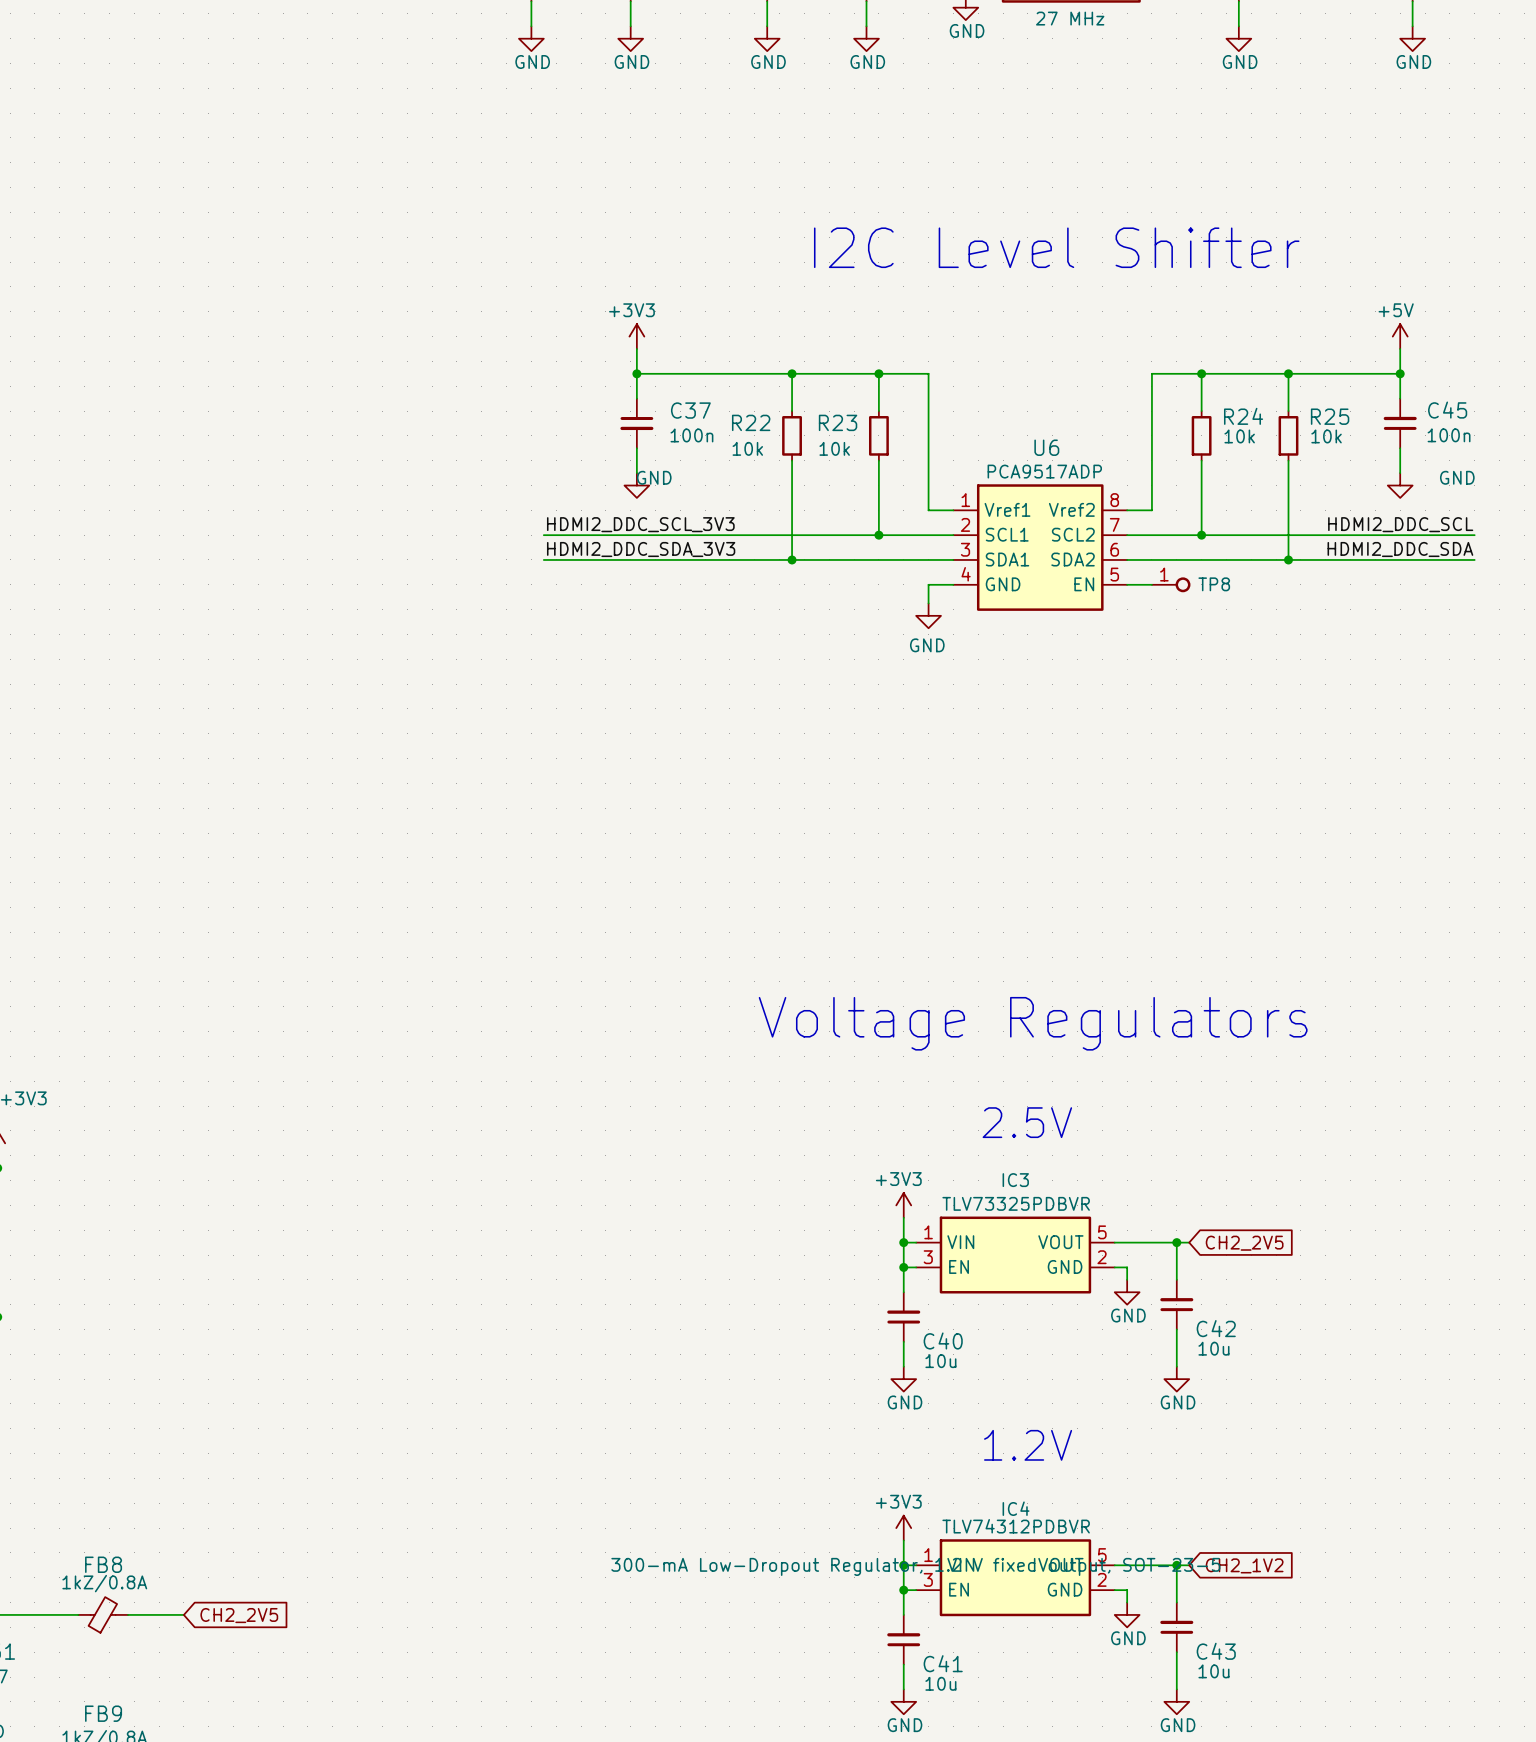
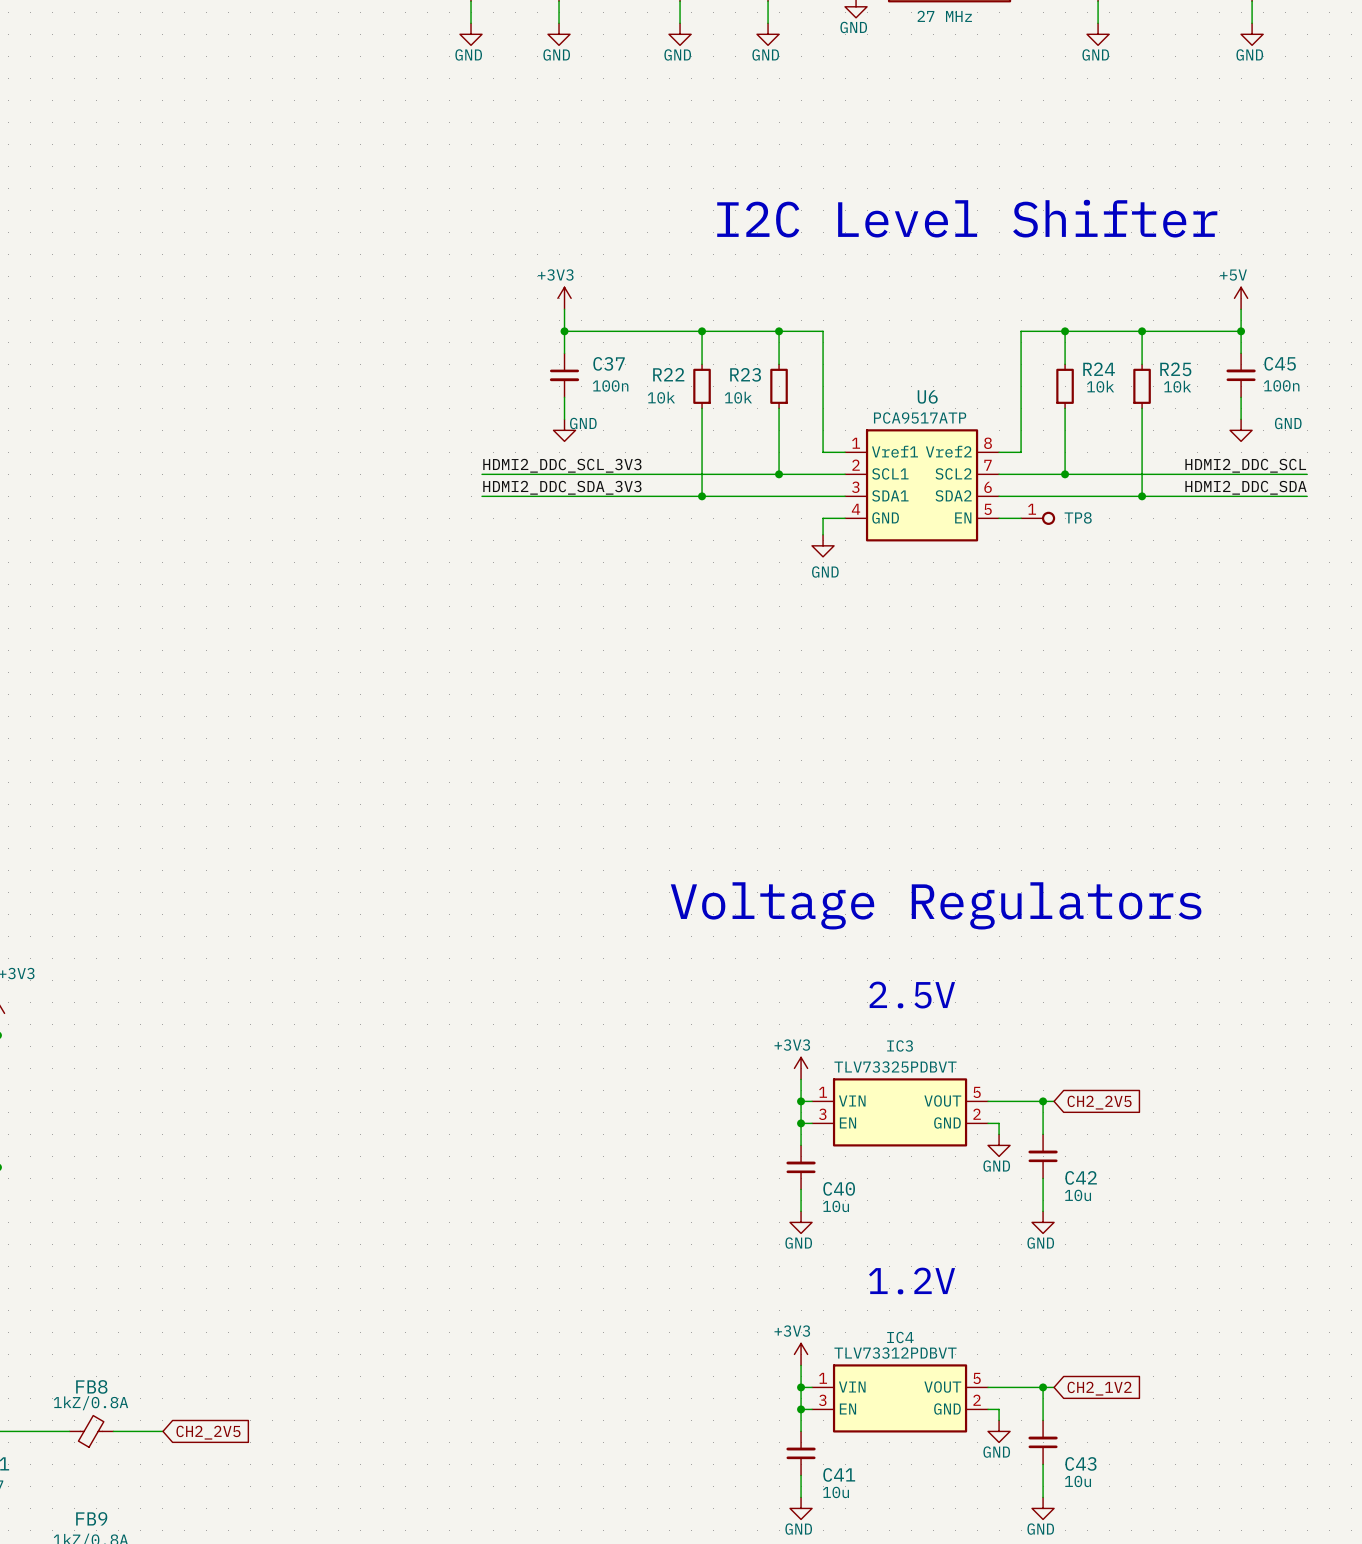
U6 value: PCA9517ADP (1044, 471) -> PCA9517ATP (920, 417)
IC3 text: TLV73325PDBVR (1016, 1203) -> TLV73325PDBVT (895, 1067)
IC4 text: TLV74312PDBVR (1016, 1526) -> TLV73312PDBVT (895, 1353)
IC4 text: 300-mA Low-Dropout Regulator, 1.2 V fixed output, SOT-23-5 (915, 1566) -> none

